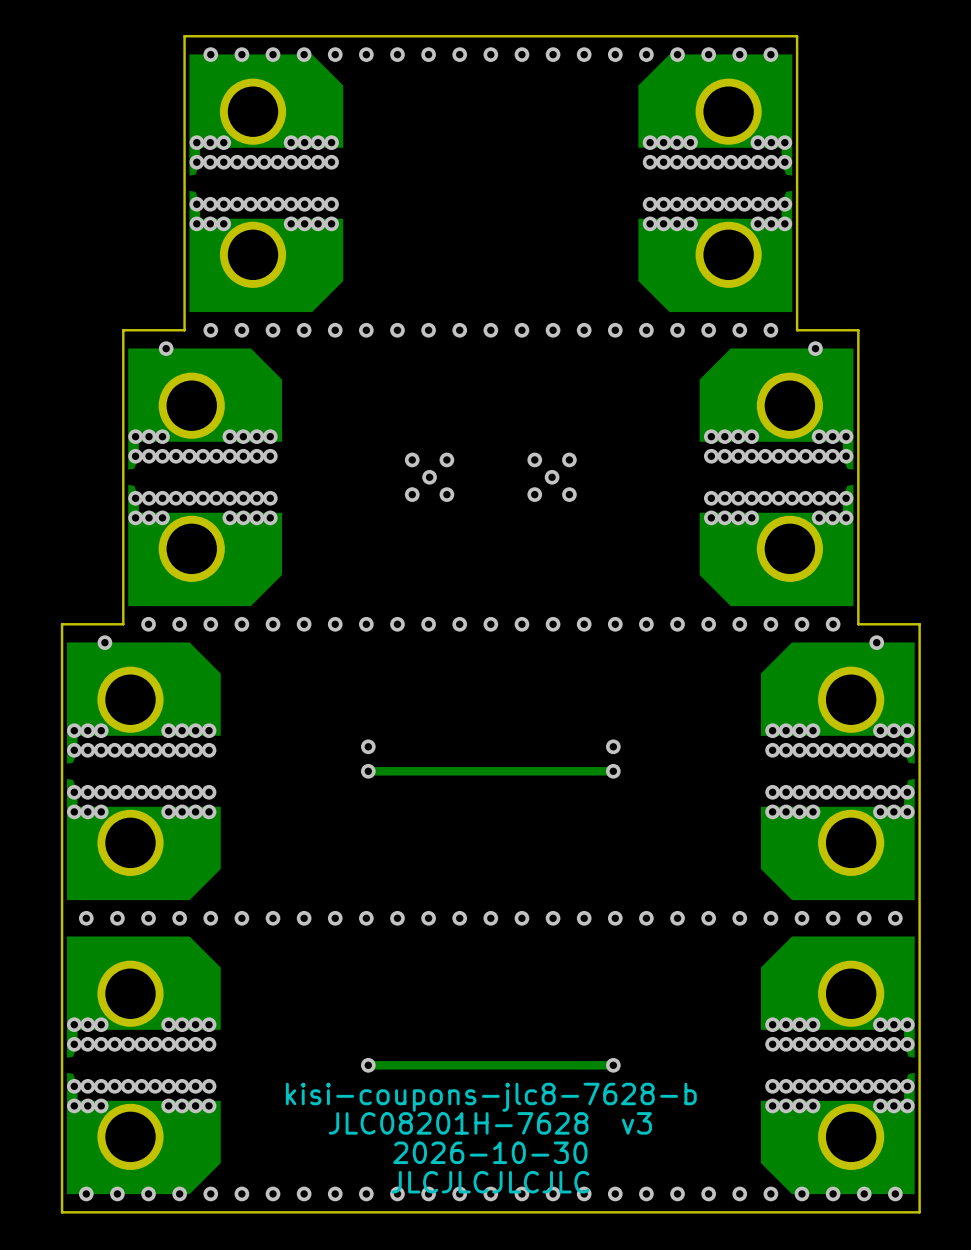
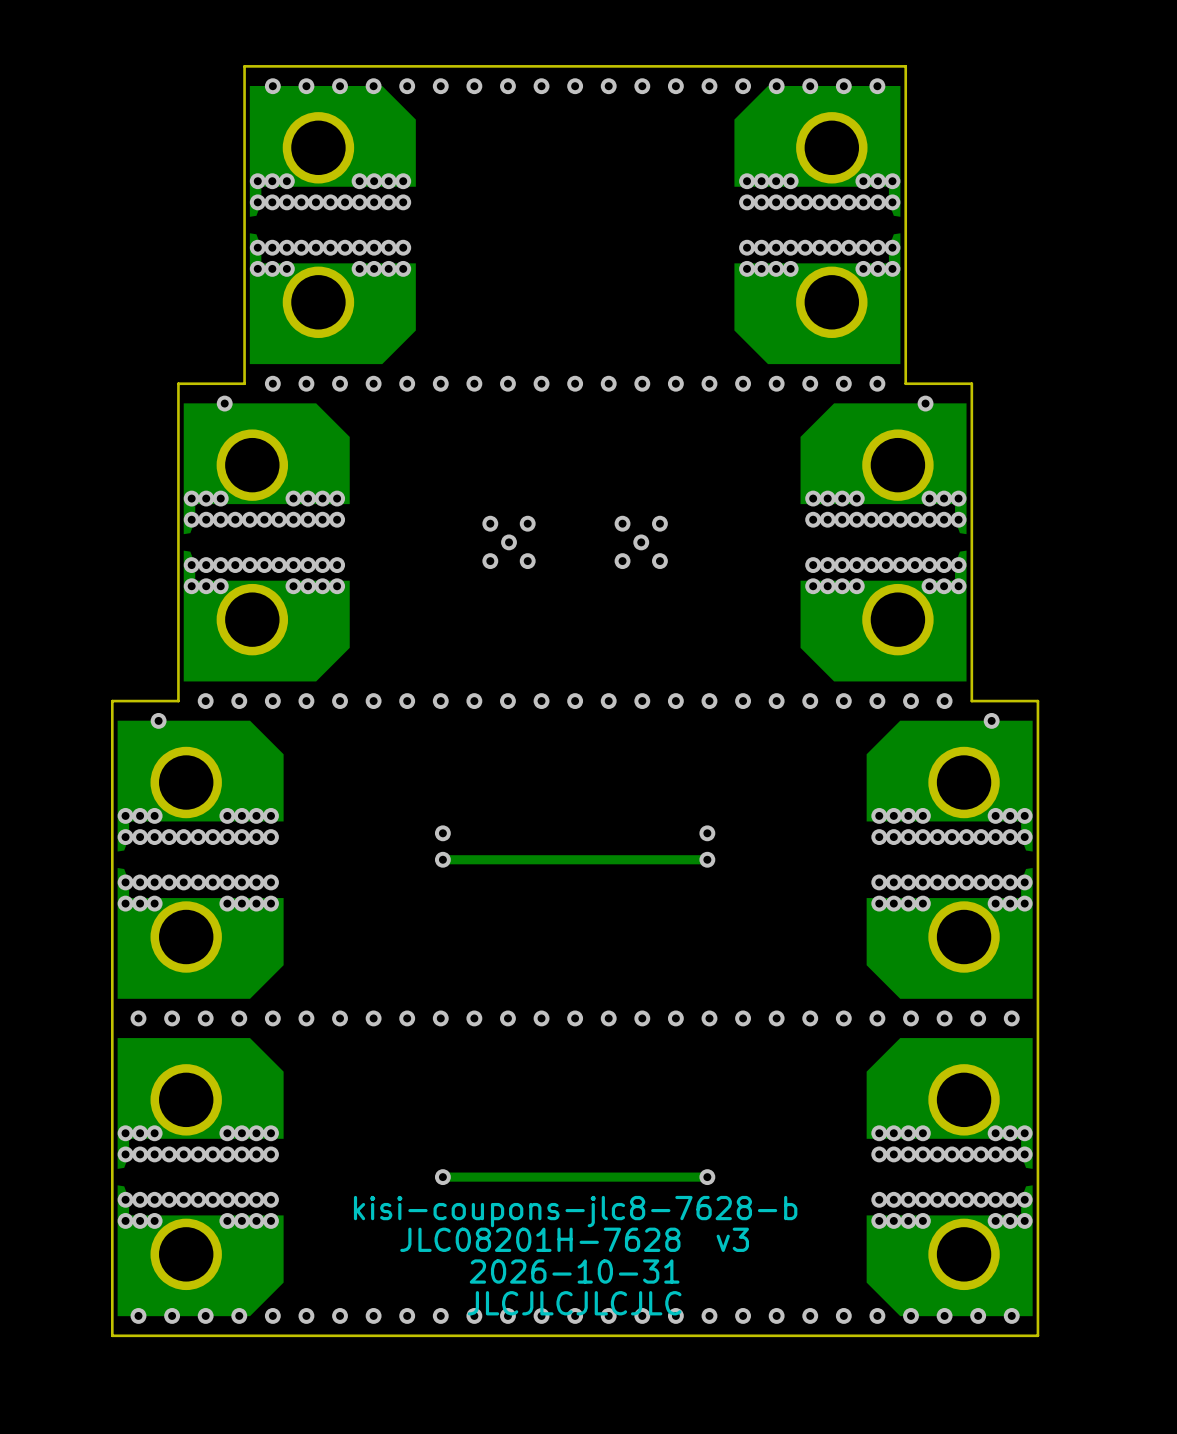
text: 2026-10-30 (490, 1152) -> 2026-10-31 (574, 1271)

